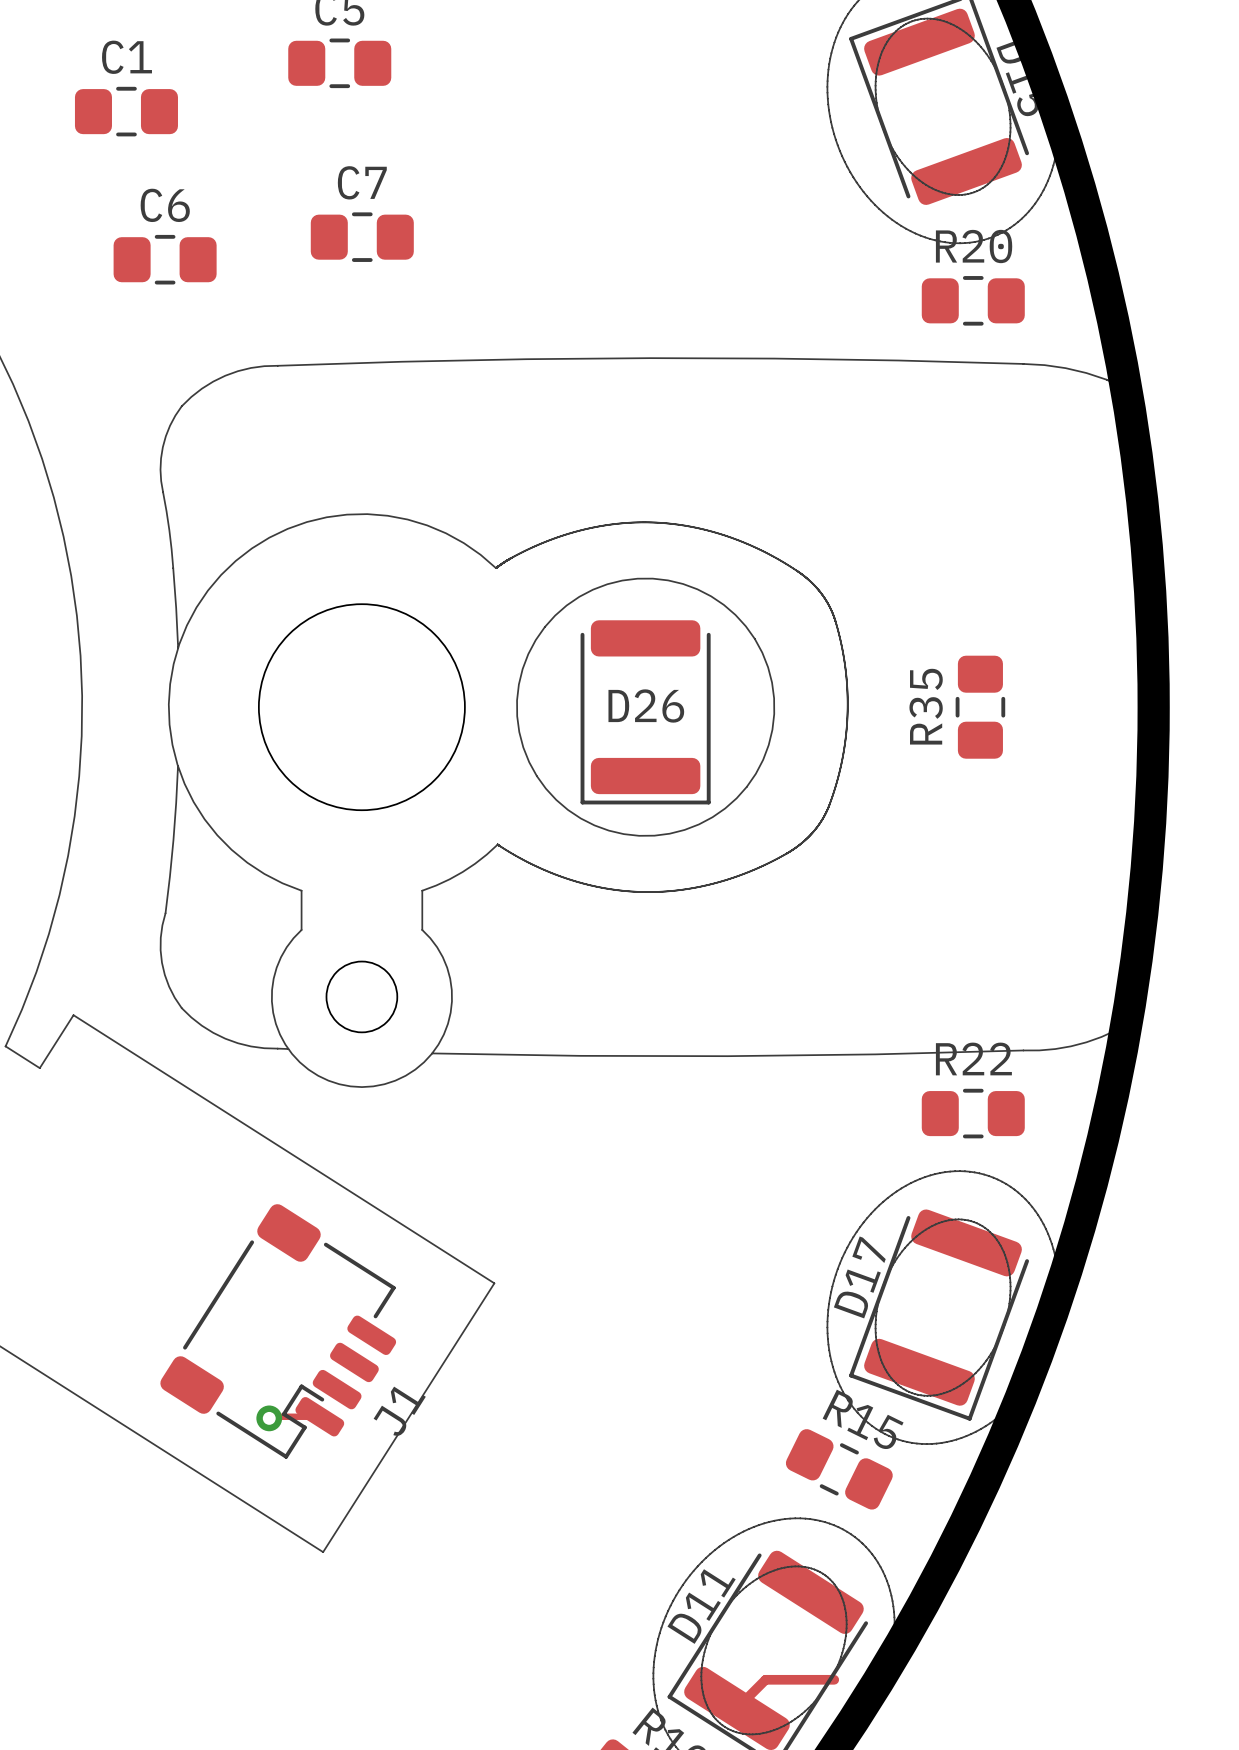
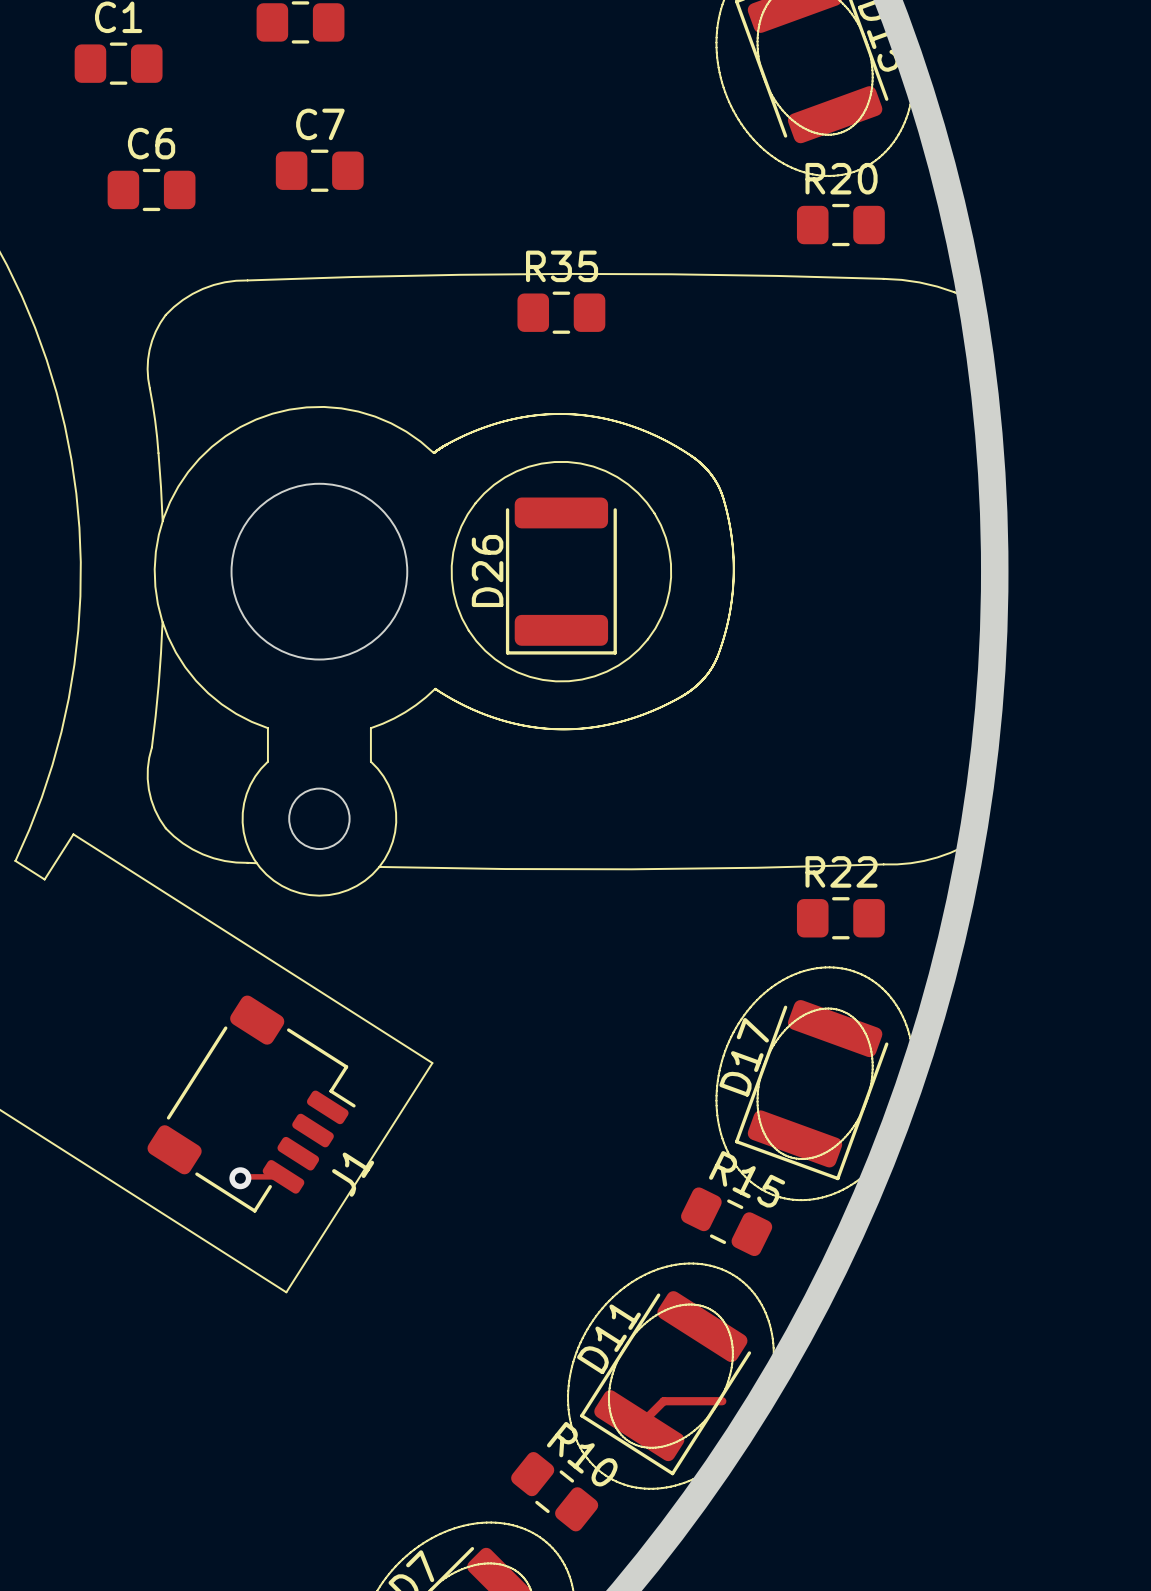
D26 name rotation: 0° (646, 706) -> 90° counterclockwise (487, 570)
R35 rotation: 0° (980, 707) -> 90° clockwise (561, 312)
R35 position: (980, 707) -> (561, 312)
J1 footprint: [160, 1204, 397, 1459] -> [147, 995, 356, 1213]

